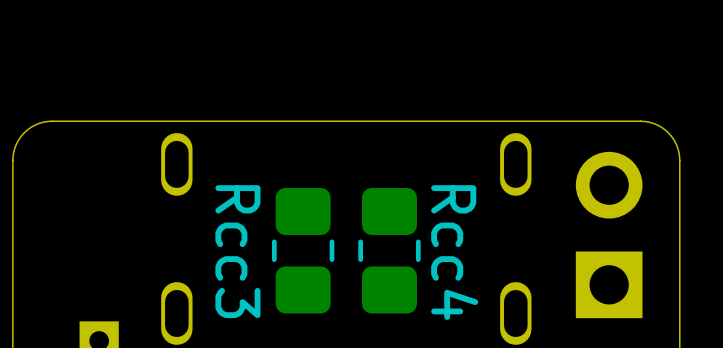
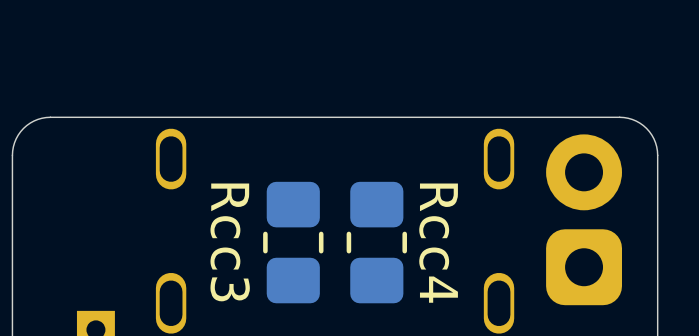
part footprint: [575, 151, 643, 319] -> [546, 134, 622, 306]

